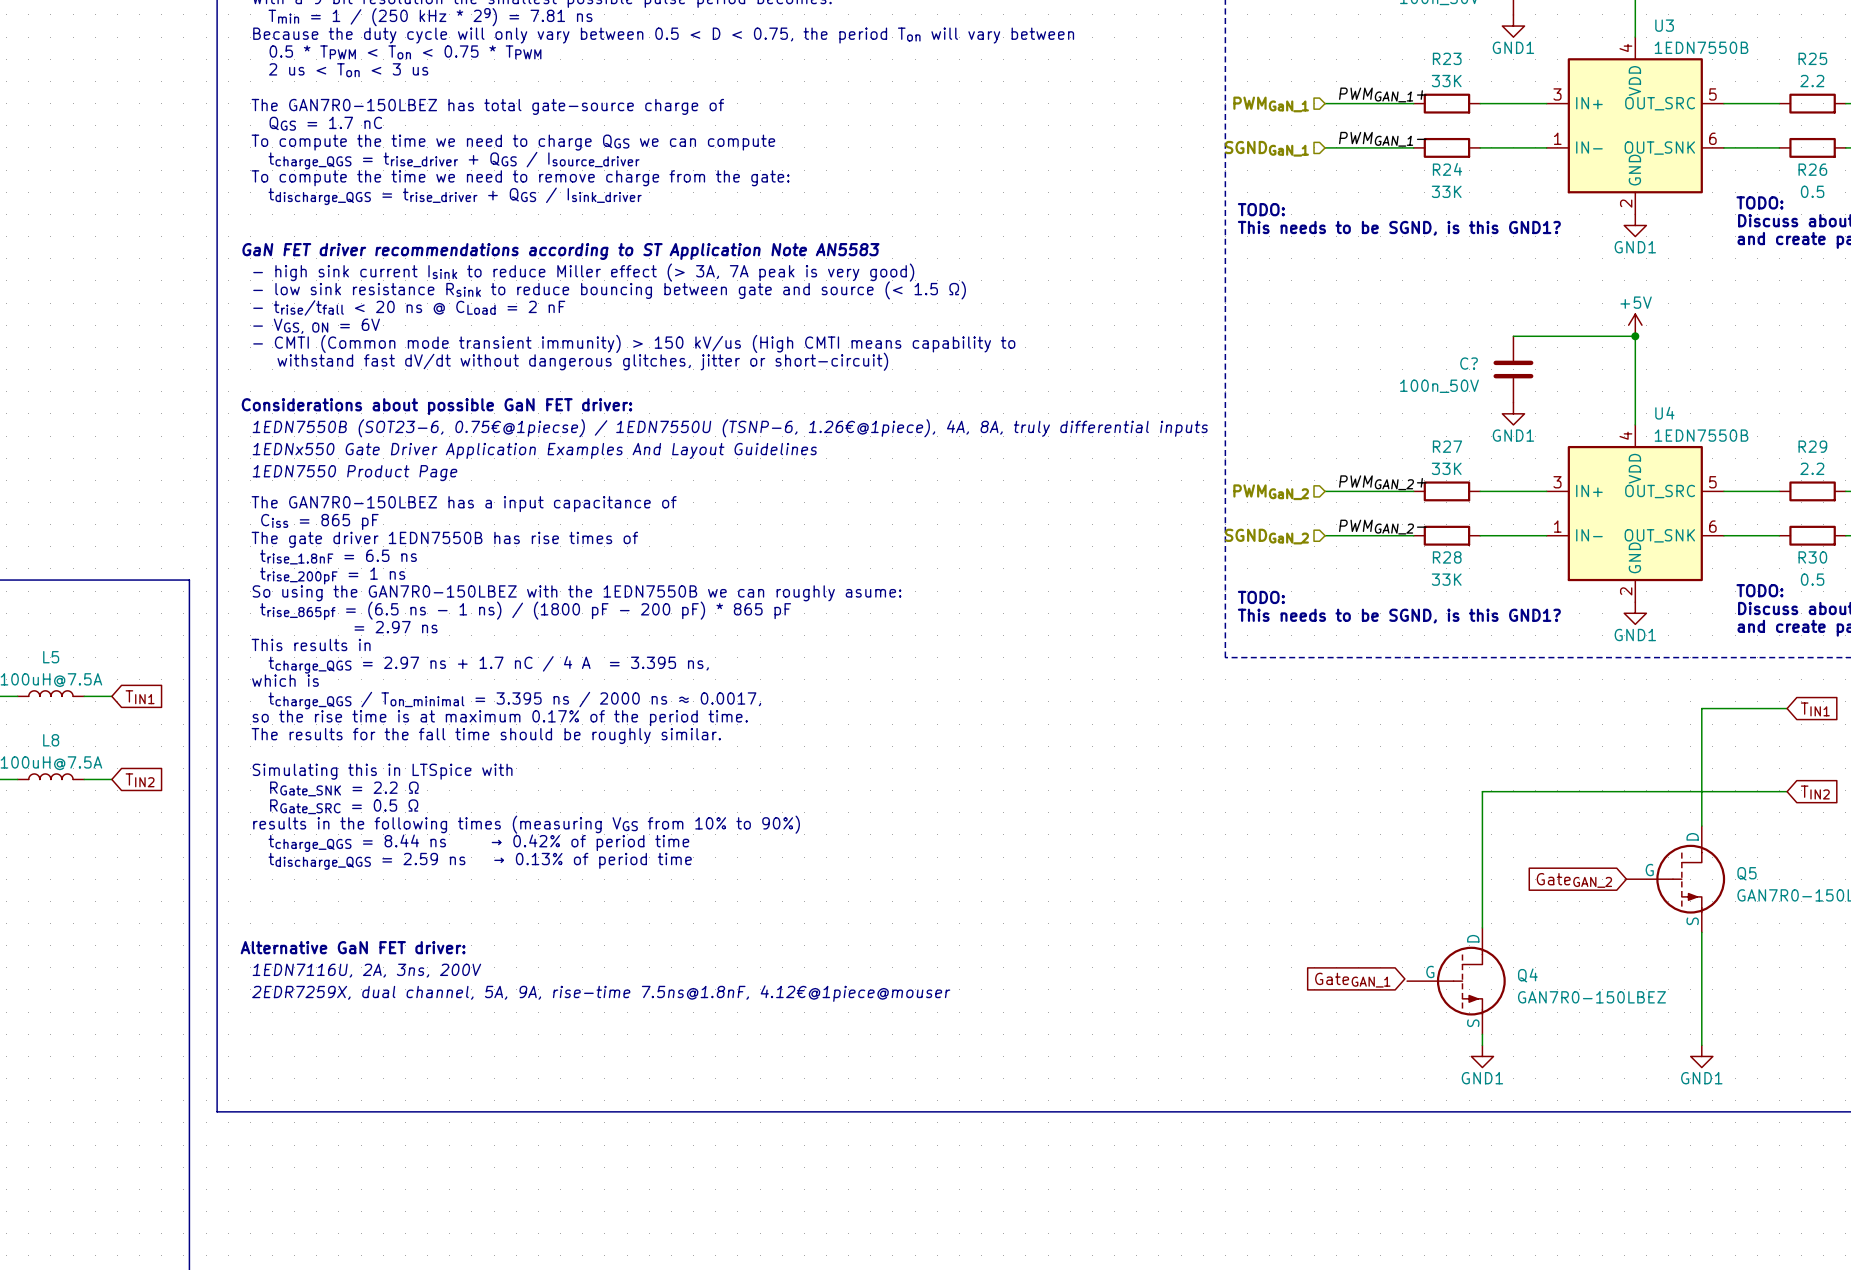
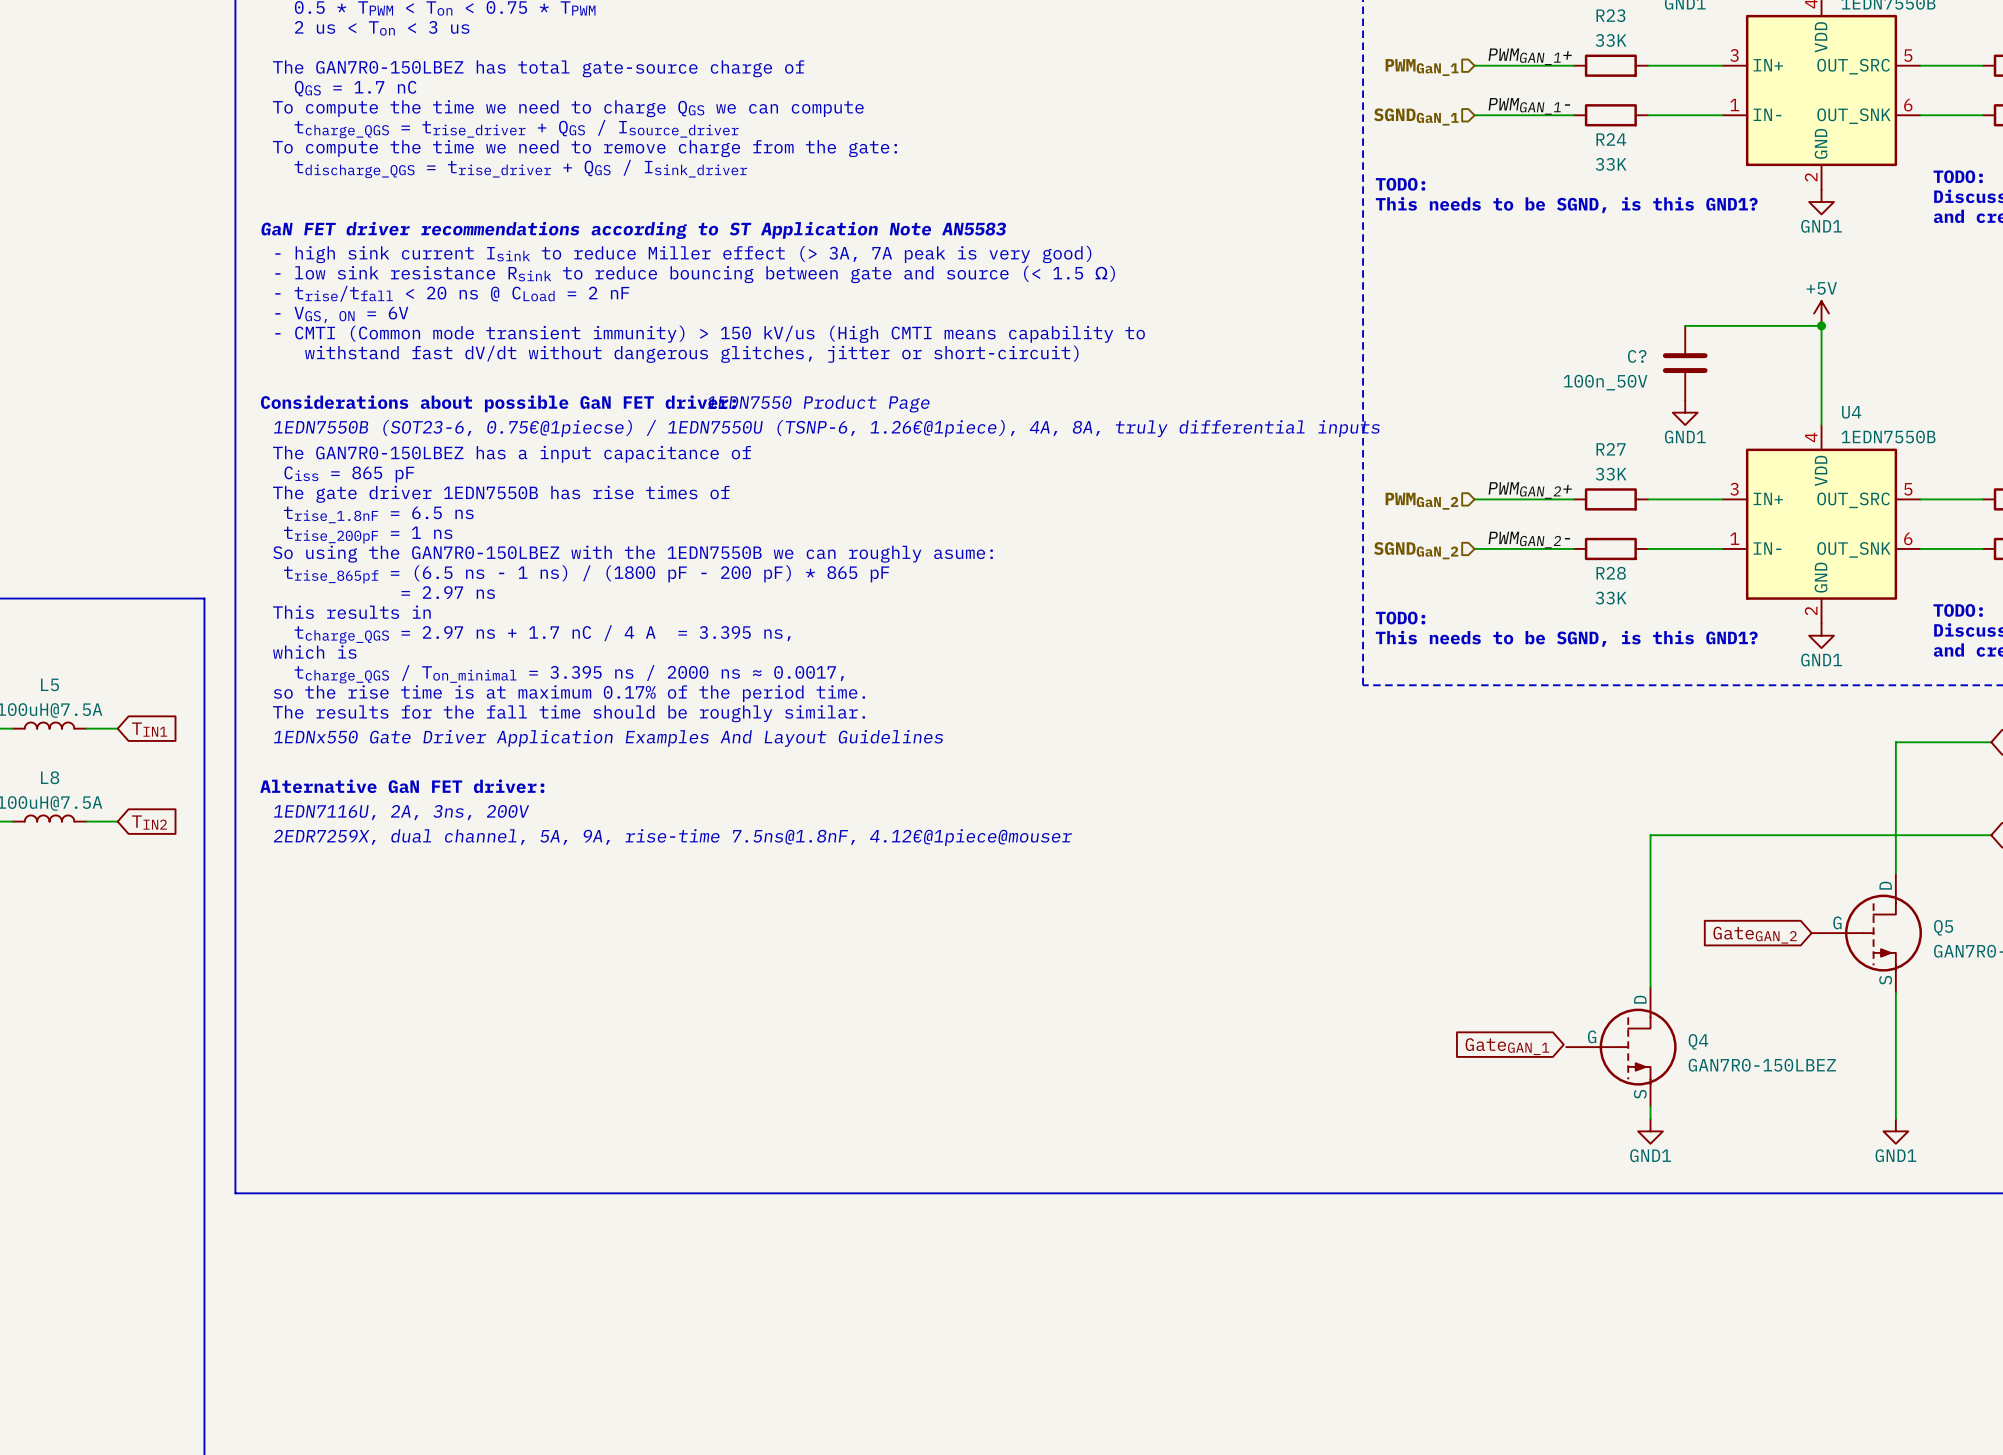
text: none -> 1EDN7550 Product Page (818, 404)
text: 1EDNx550 Gate Driver Application Examples And Layout Guidelines (534, 450) -> The GAN7R0-150LBEZ has a input capacitance of (511, 454)
text: 1EDN7550 Product Page (354, 473) -> none
text: The GAN7R0-150LBEZ has a input capacitance of (464, 504) -> none
text position: Ciss = 865 pF (319, 521) -> Ciss = 865 pF (349, 474)
text position: The gate driver 1EDN7550B has rise times of (444, 539) -> The gate driver 1EDN7550B has rise times of (501, 494)
text position: trise_1.8nF = 6.5 ns (338, 557) -> trise_1.8nF = 6.5 ns (378, 514)
text position: trise_200pF = 1 ns (332, 575) -> trise_200pF = 1 ns (368, 535)
text position: So using the GAN7R0-150LBEZ with the 1EDN7550B we can roughly asume: (577, 593) -> So using the GAN7R0-150LBEZ with the 1EDN7550B we can roughly asume: (633, 554)
text position: trise_865pf = (6.5 ns - 1 ns) / (1800 pF - 200 pF) * 865 pF (525, 610) -> trise_865pf = (6.5 ns - 1 ns) / (1800 pF - 200 pF) * 865 pF (586, 574)
text position: = 2.97 ns (396, 627) -> = 2.97 ns (448, 592)
text position: This results in (311, 644) -> This results in (351, 612)
text position: tcharge_QGS = 2.97 ns + 1.7 nC / 4 A = 3.395 ns, (488, 664) -> tcharge_QGS = 2.97 ns + 1.7 nC / 4 A = 3.395 ns, (542, 634)
text position: which is (285, 680) -> which is (314, 652)
text position: tcharge_QGS / Ton_minimal = 3.395 ns / 2000 ns ≈ 0.0017, (514, 700) -> tcharge_QGS / Ton_minimal = 3.395 ns / 2000 ns ≈ 0.0017, (569, 674)
text: none -> 1EDNx550 Gate Driver Application Examples And Layout Guidelines (608, 738)
text position: so the rise time is at maximum 0.17% of the period time. (500, 718) -> so the rise time is at maximum 0.17% of the period time. (569, 693)
text position: The results for the fall time should be roughly similar. (486, 736) -> The results for the fall time should be roughly similar. (569, 713)
text: Simulating this in LTSpice with (382, 771) -> 1EDN7116U, 2A, 3ns, 200V (401, 812)
text: RGate_SNK = 2.2 Ω (344, 788) -> none
text: RGate_SRC = 0.5 Ω (344, 806) -> none
text: results in the following times (measuring VGS from 10% to 90%) (526, 824) -> none
text: tcharge_QGS = 8.44 ns → 0.42% of period time (478, 843) -> none
text: tdischarge_QGS = 2.59 ns → 0.13% of period time (480, 861) -> none
text position: Alternative GaN FET driver: (353, 947) -> Alternative GaN FET driver: (402, 786)
text: 1EDN7116U, 2A, 3ns, 200V (366, 970) -> none
text position: 2EDR7259X, dual channel, 5A, 9A, rise-time 7.5ns@1.8nF, 4.12€@1piece@mouser (601, 993) -> 2EDR7259X, dual channel, 5A, 9A, rise-time 7.5ns@1.8nF, 4.12€@1piece@mouser (672, 837)

